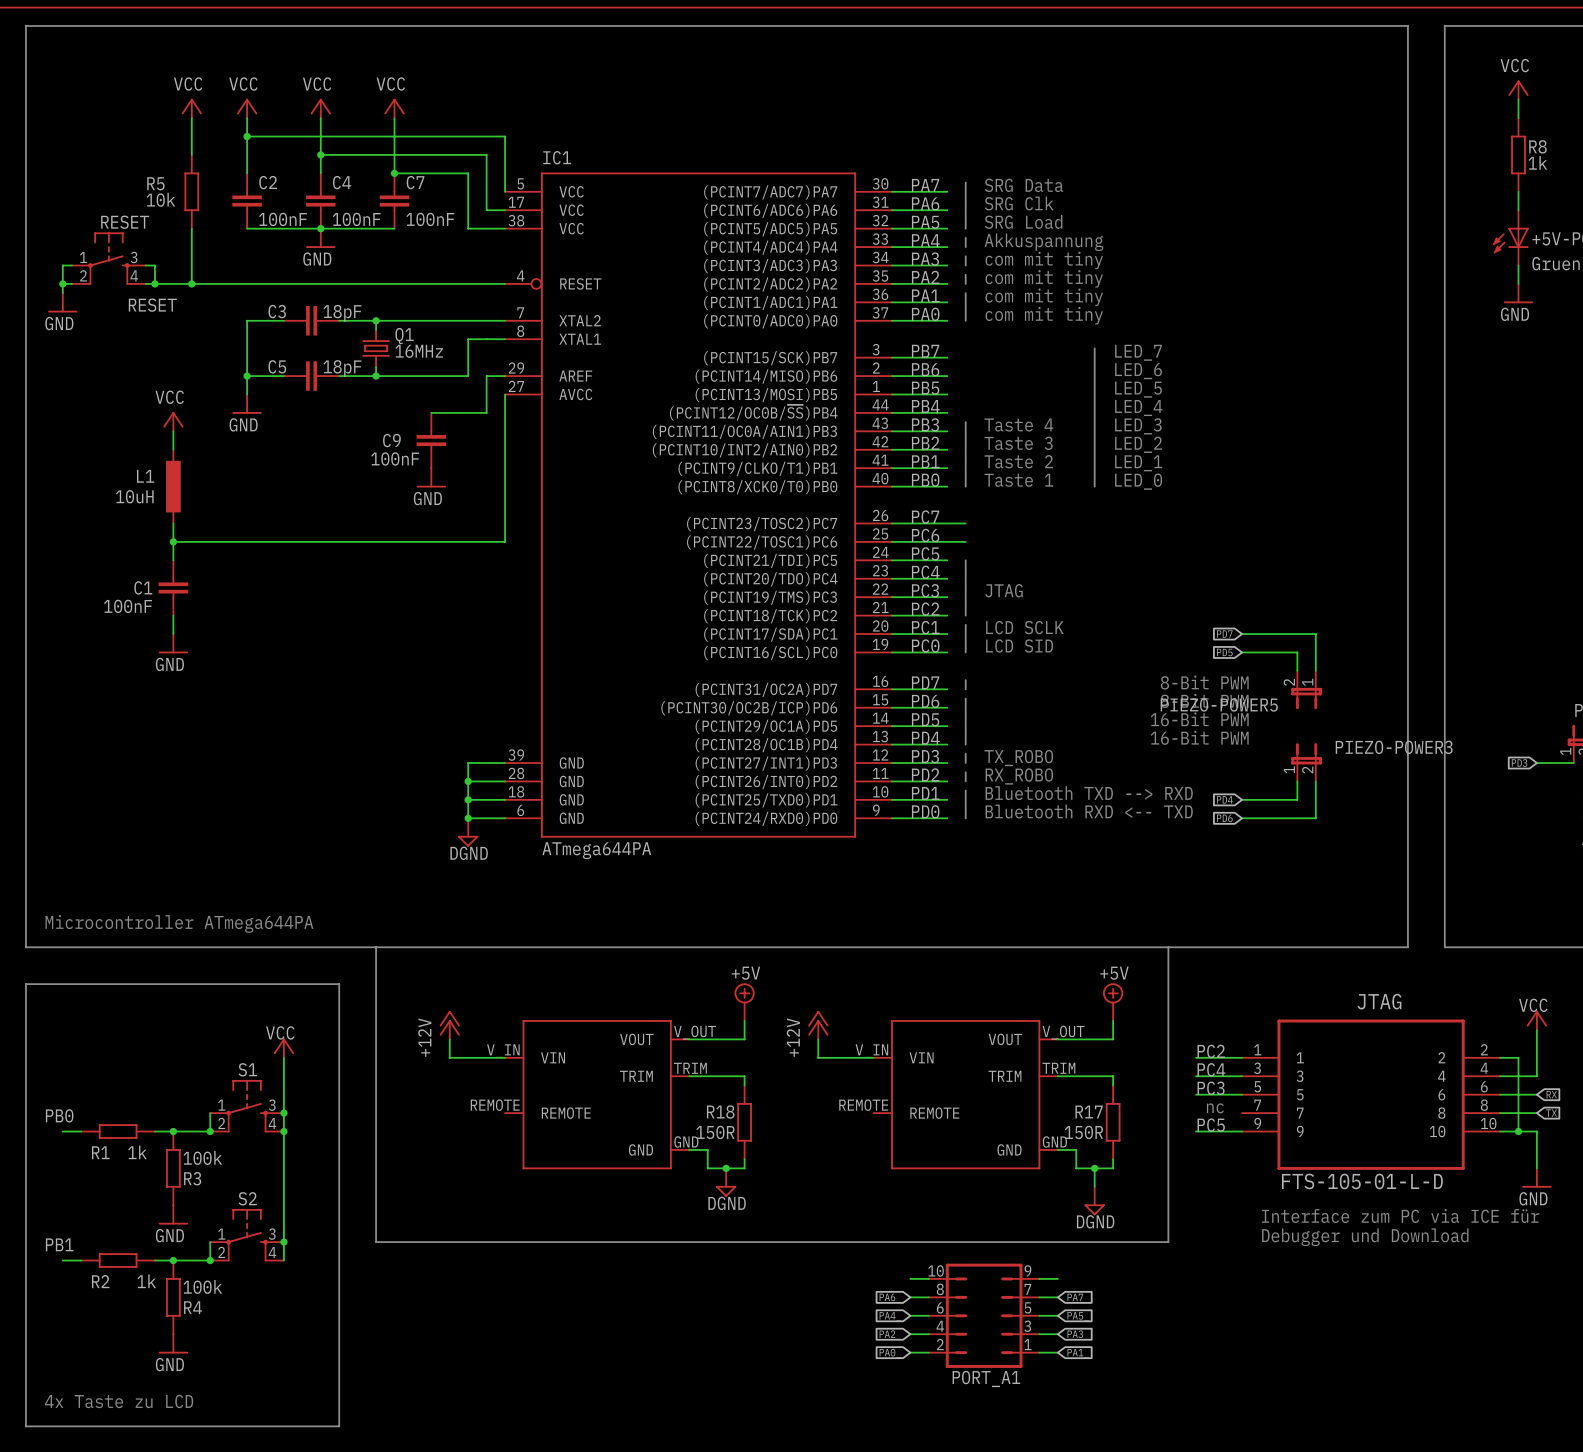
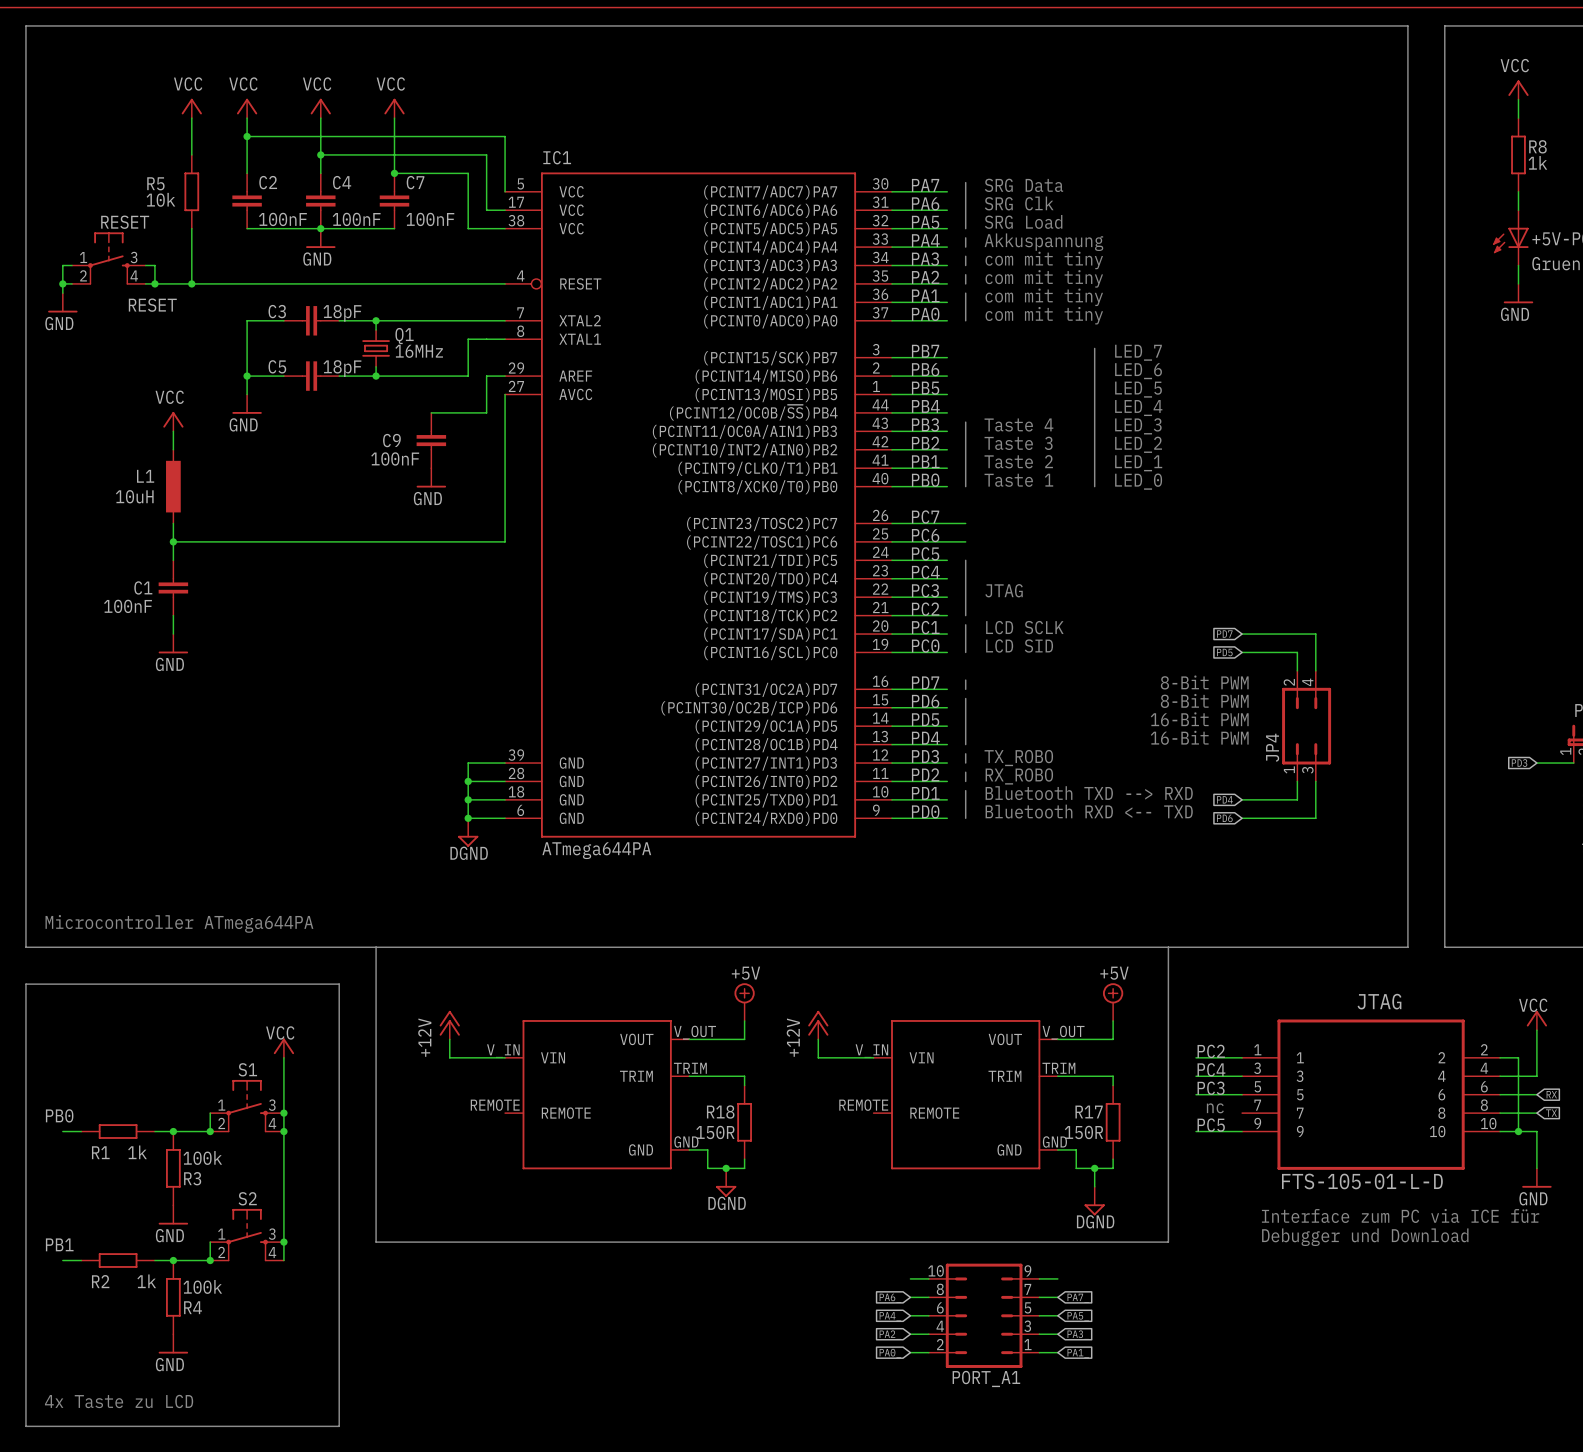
PIEZO-POWER5: (1306, 690) -> none
JP4: none -> (1306, 726)
PIEZO-POWER3: (1306, 762) -> none

